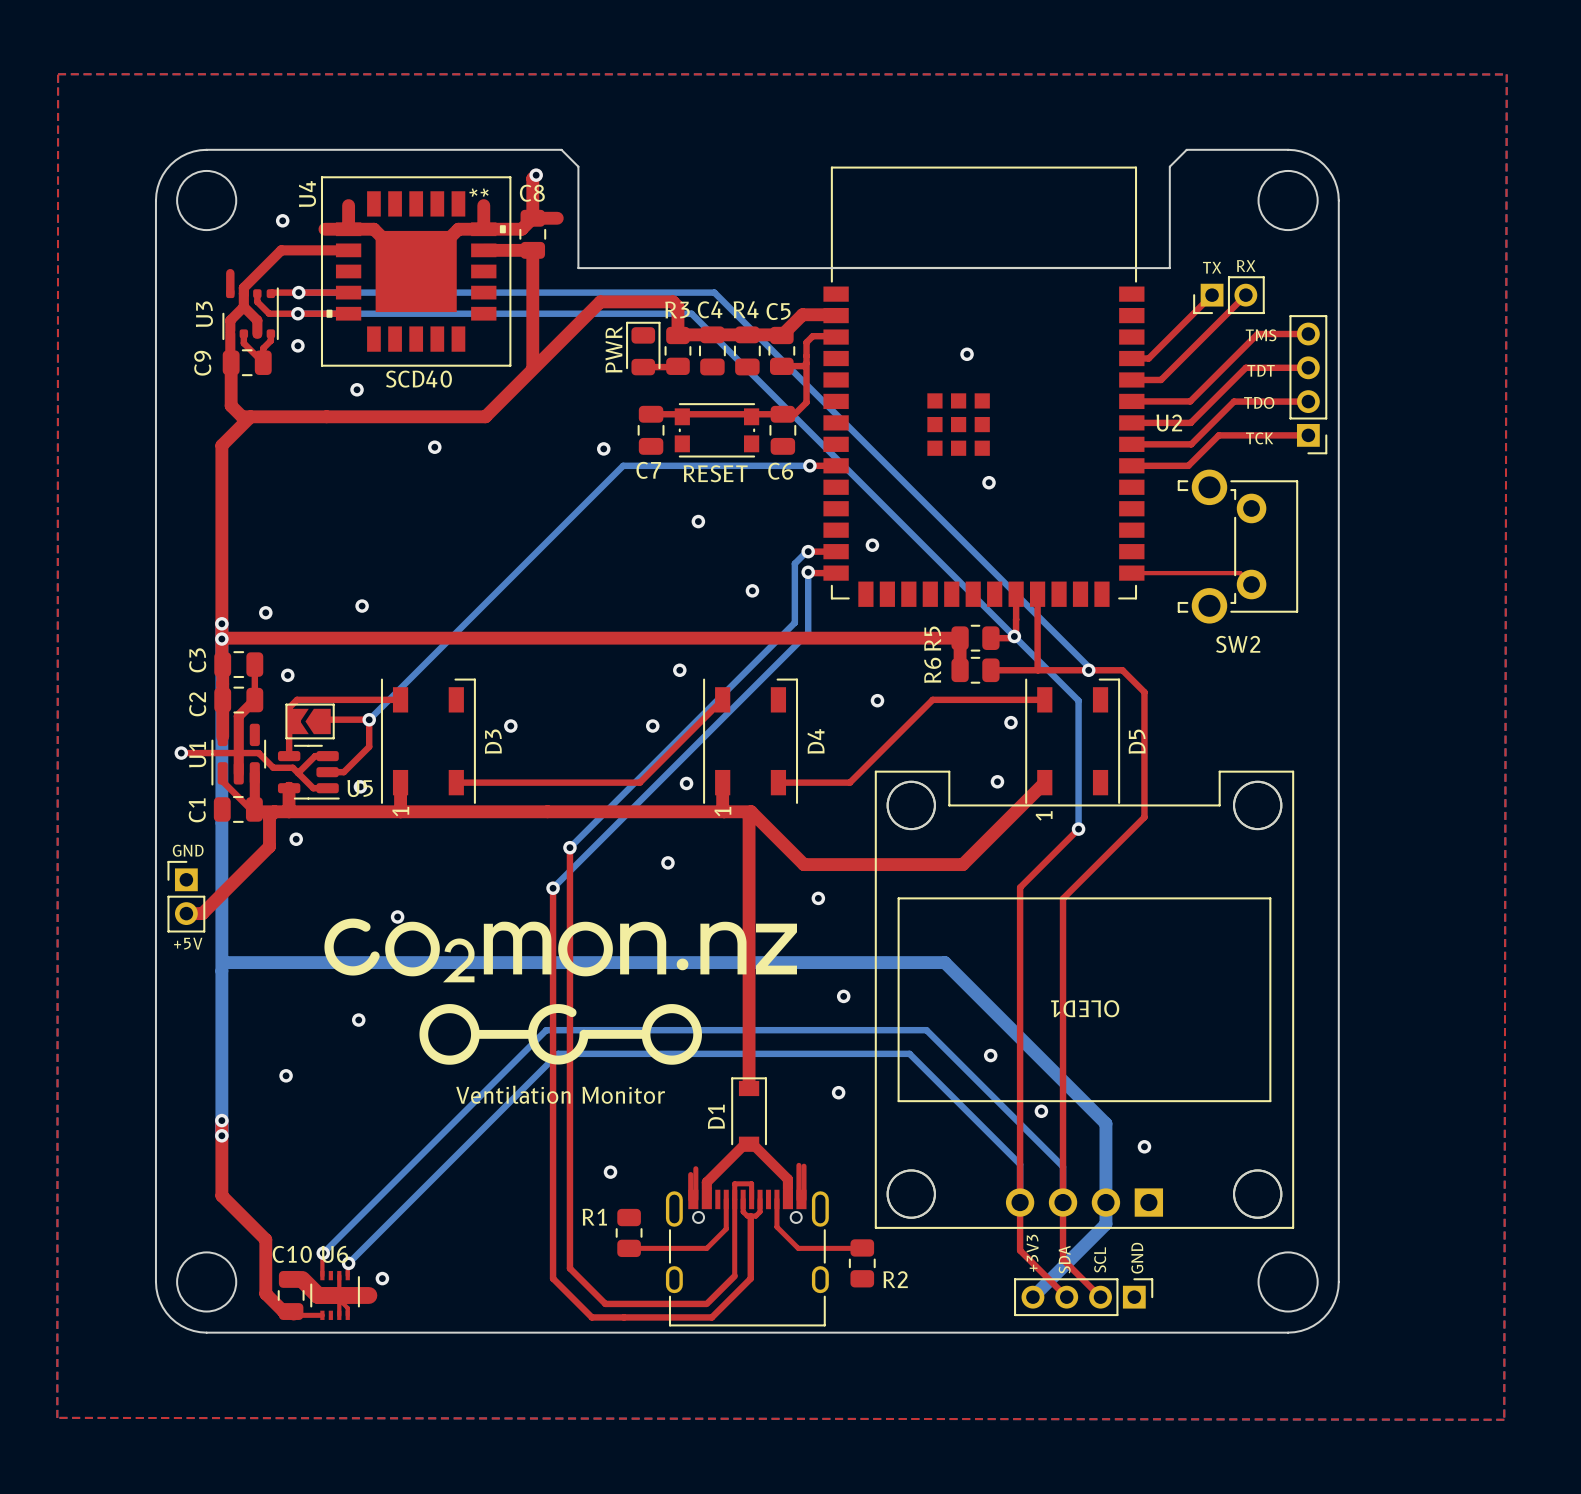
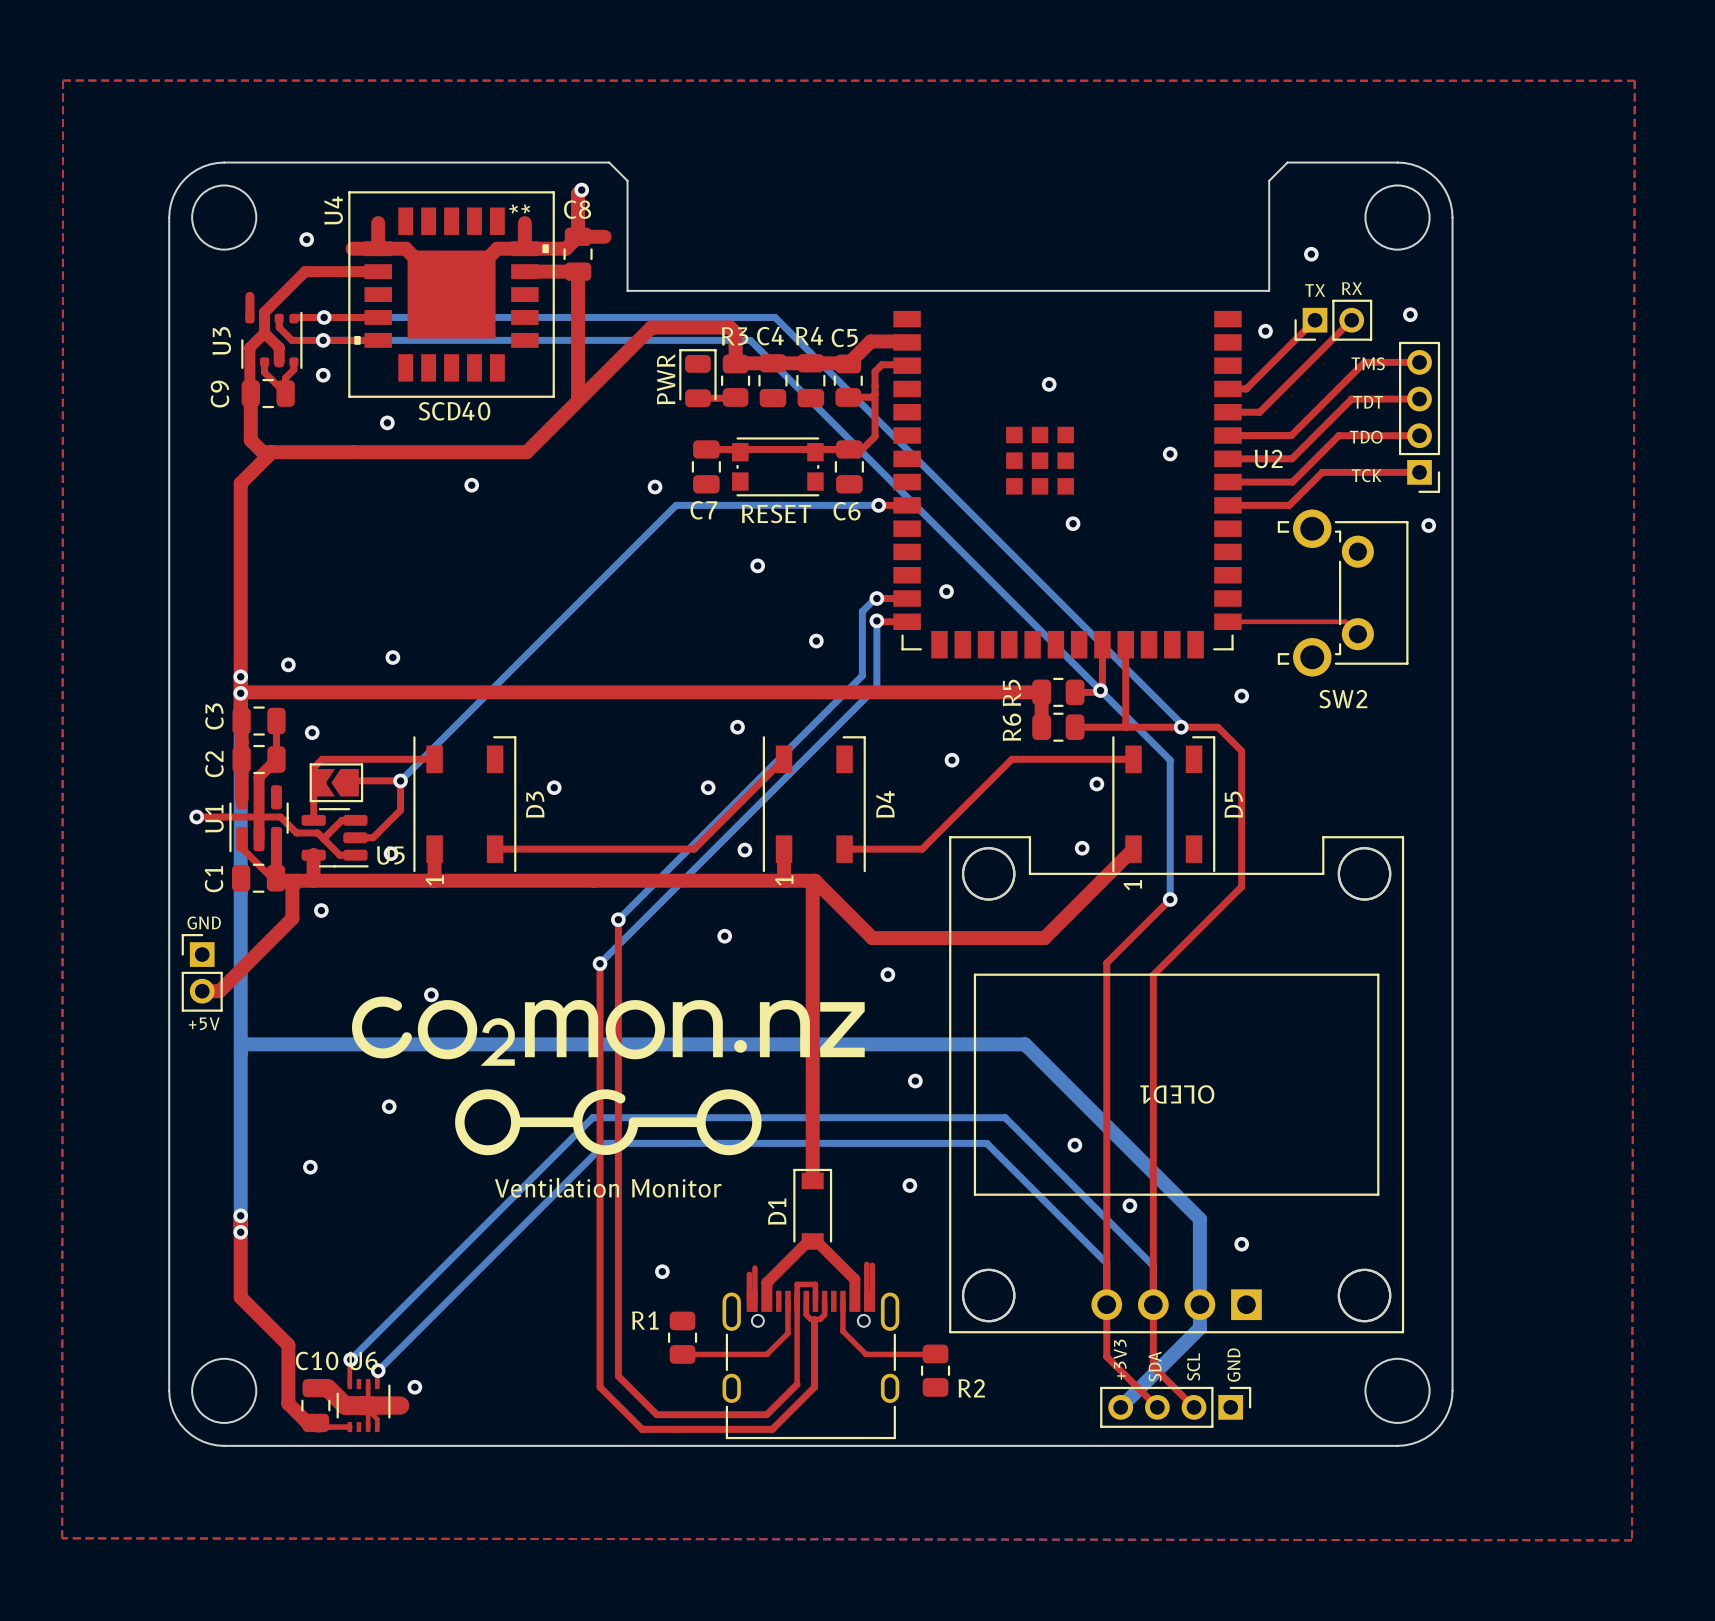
U2 footprint: [823, 166, 1145, 607] -> [893, 310, 1242, 659]
via: none -> (1311, 254)
via: none -> (1410, 314)
via: none -> (1265, 331)
via: none -> (1170, 454)
via: none -> (1428, 525)
via: none -> (1241, 696)

